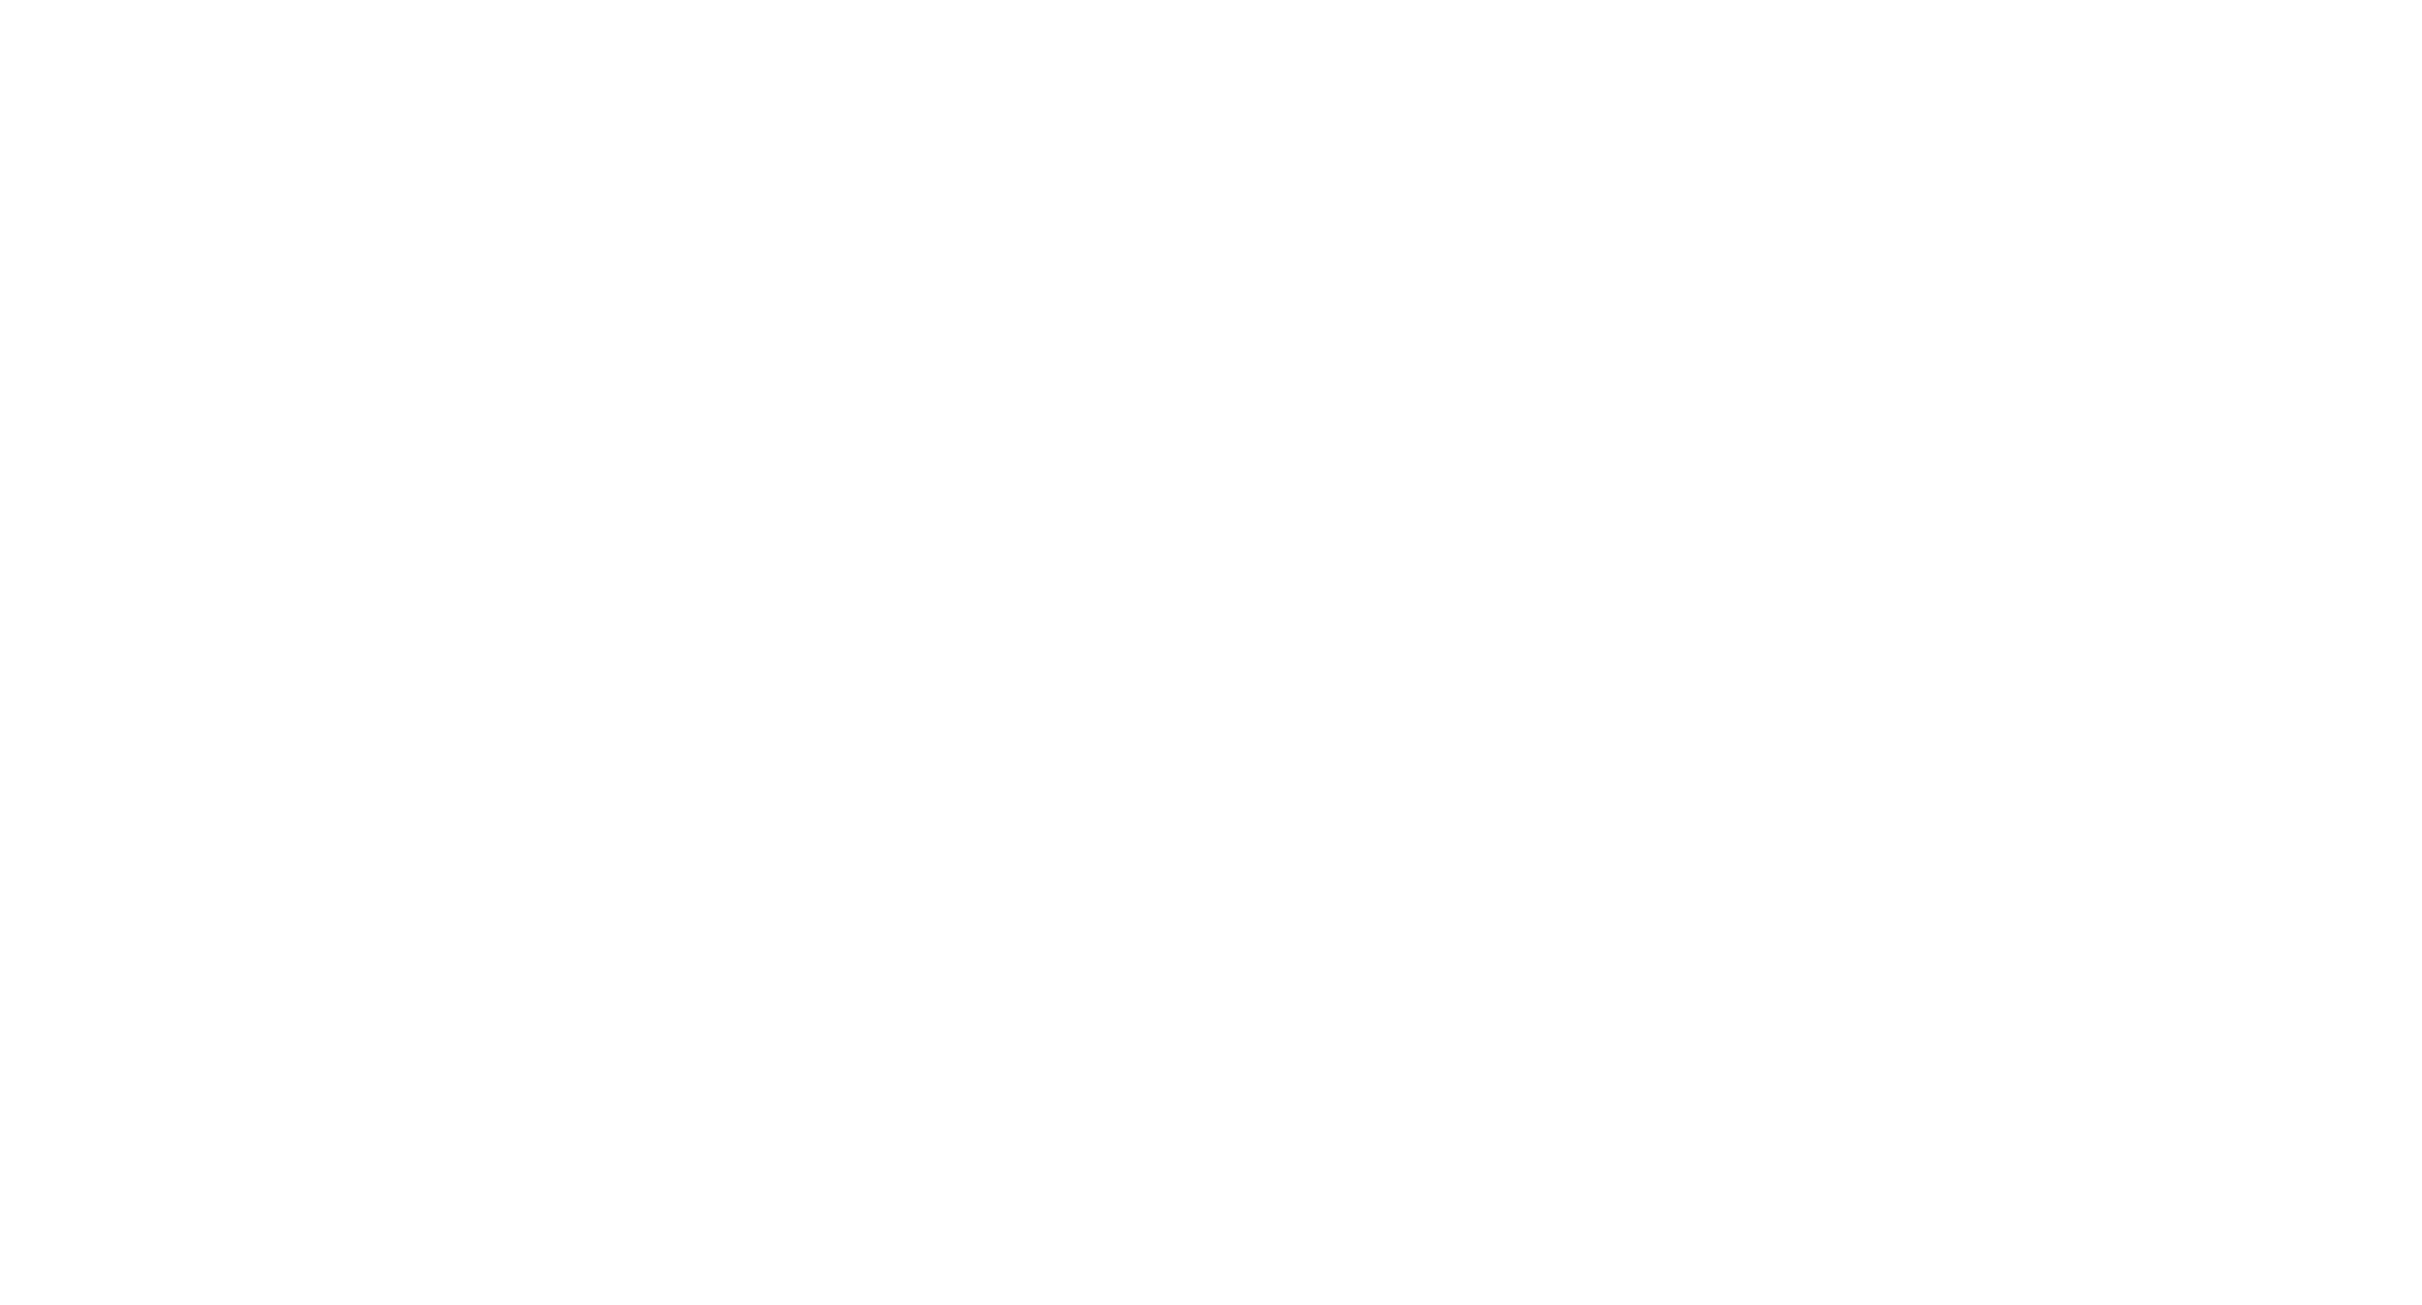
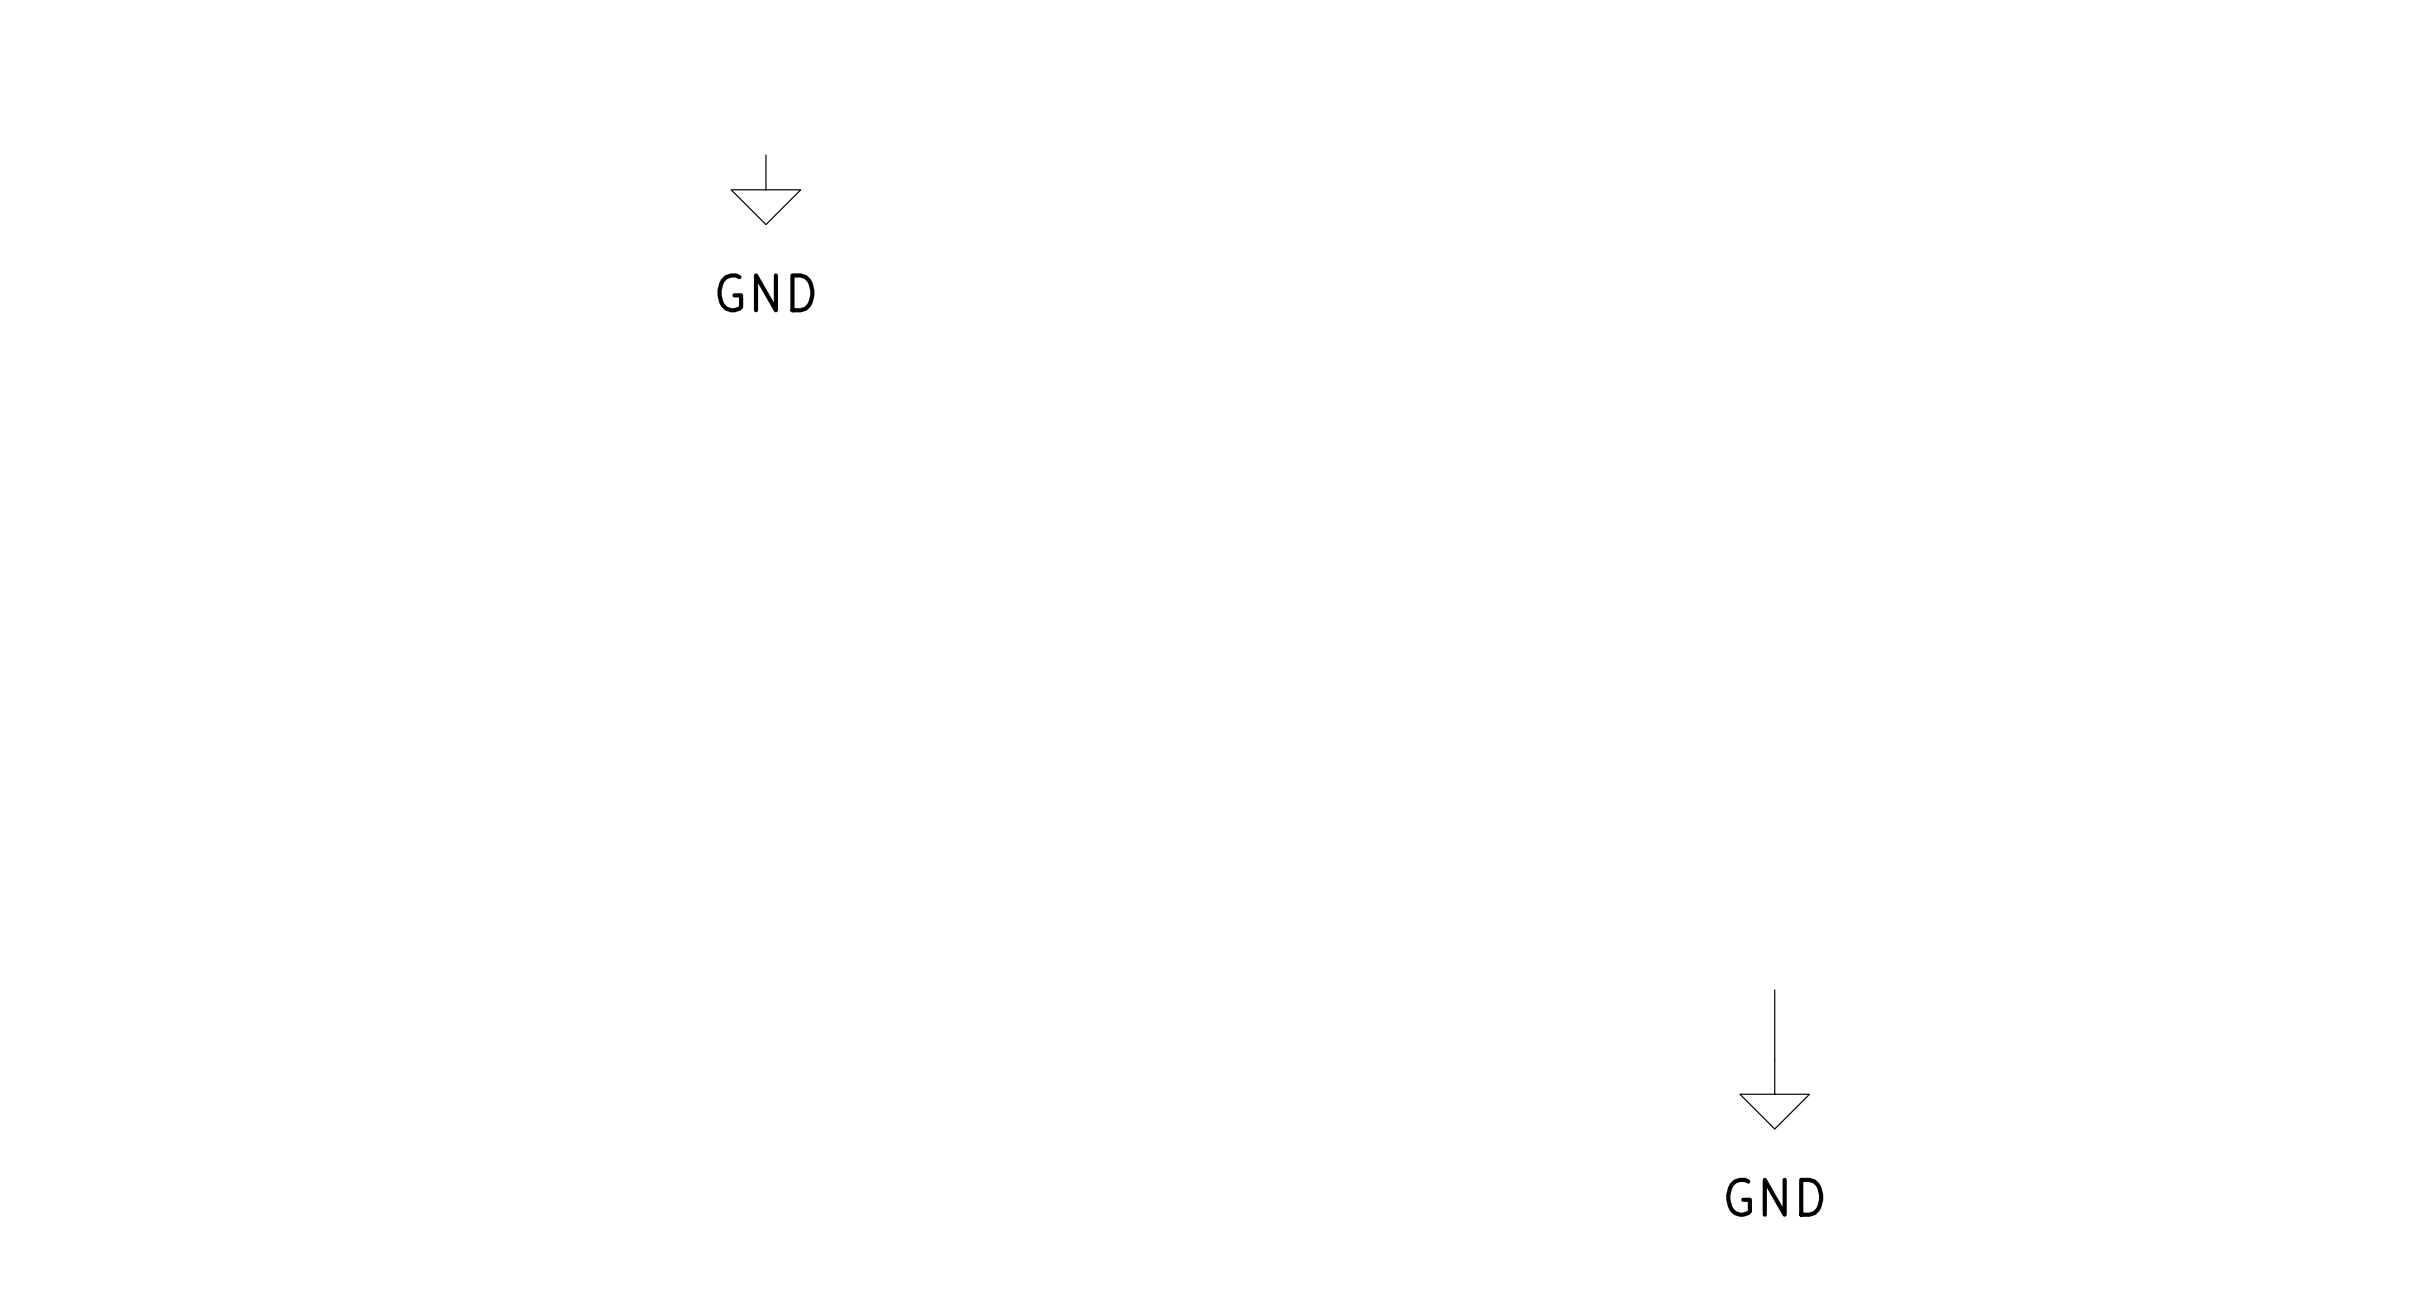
power symbol: none -> GND (765, 189)
wire: none -> (1774, 989) (1774, 1059)
power symbol: none -> GND (1774, 1094)

